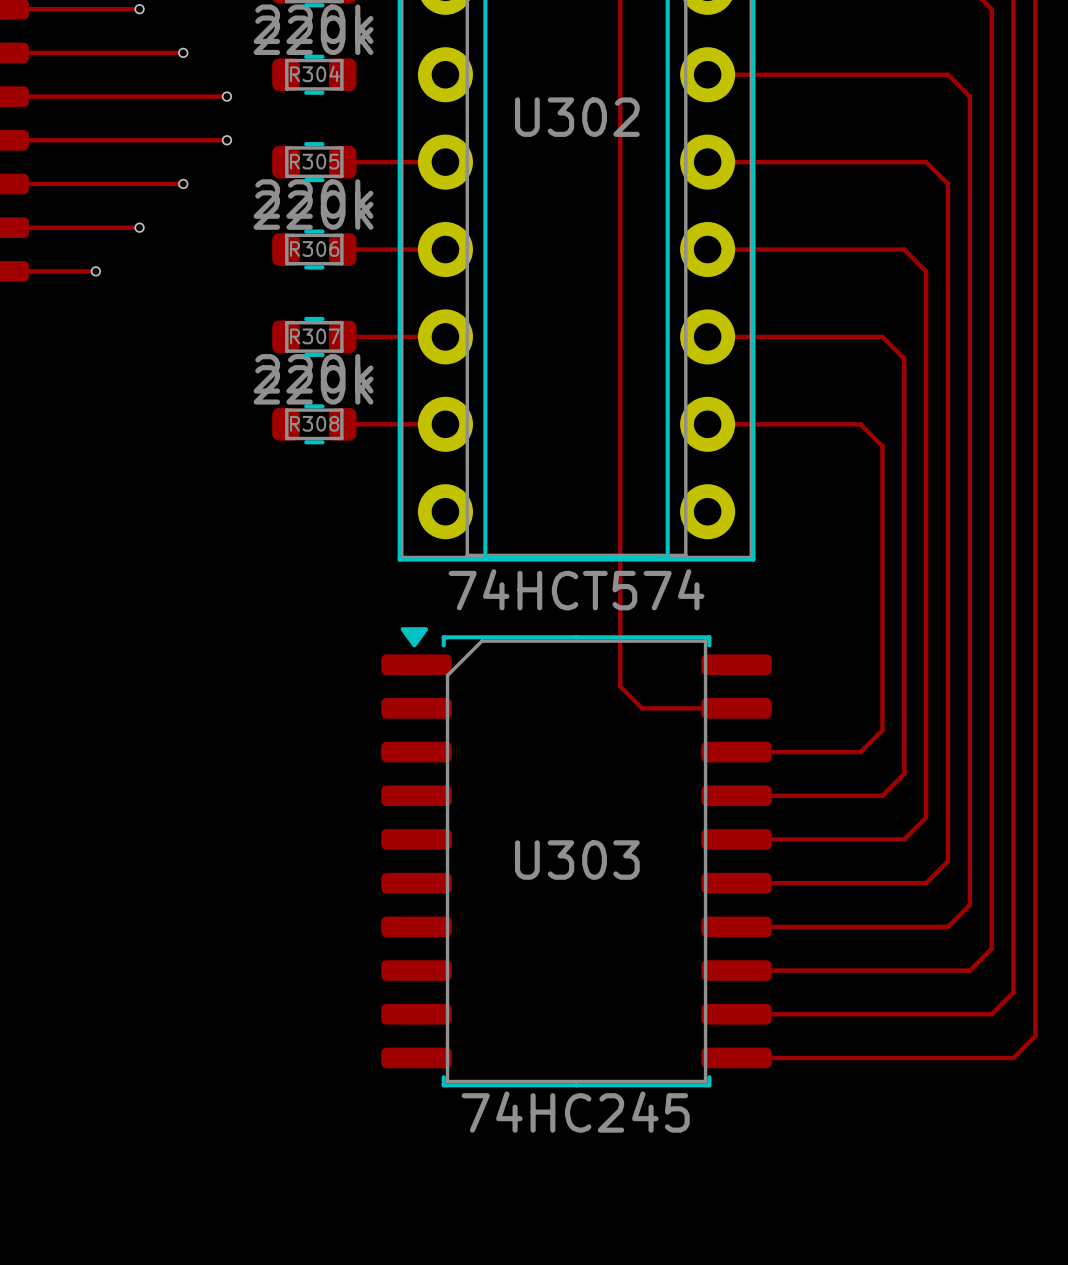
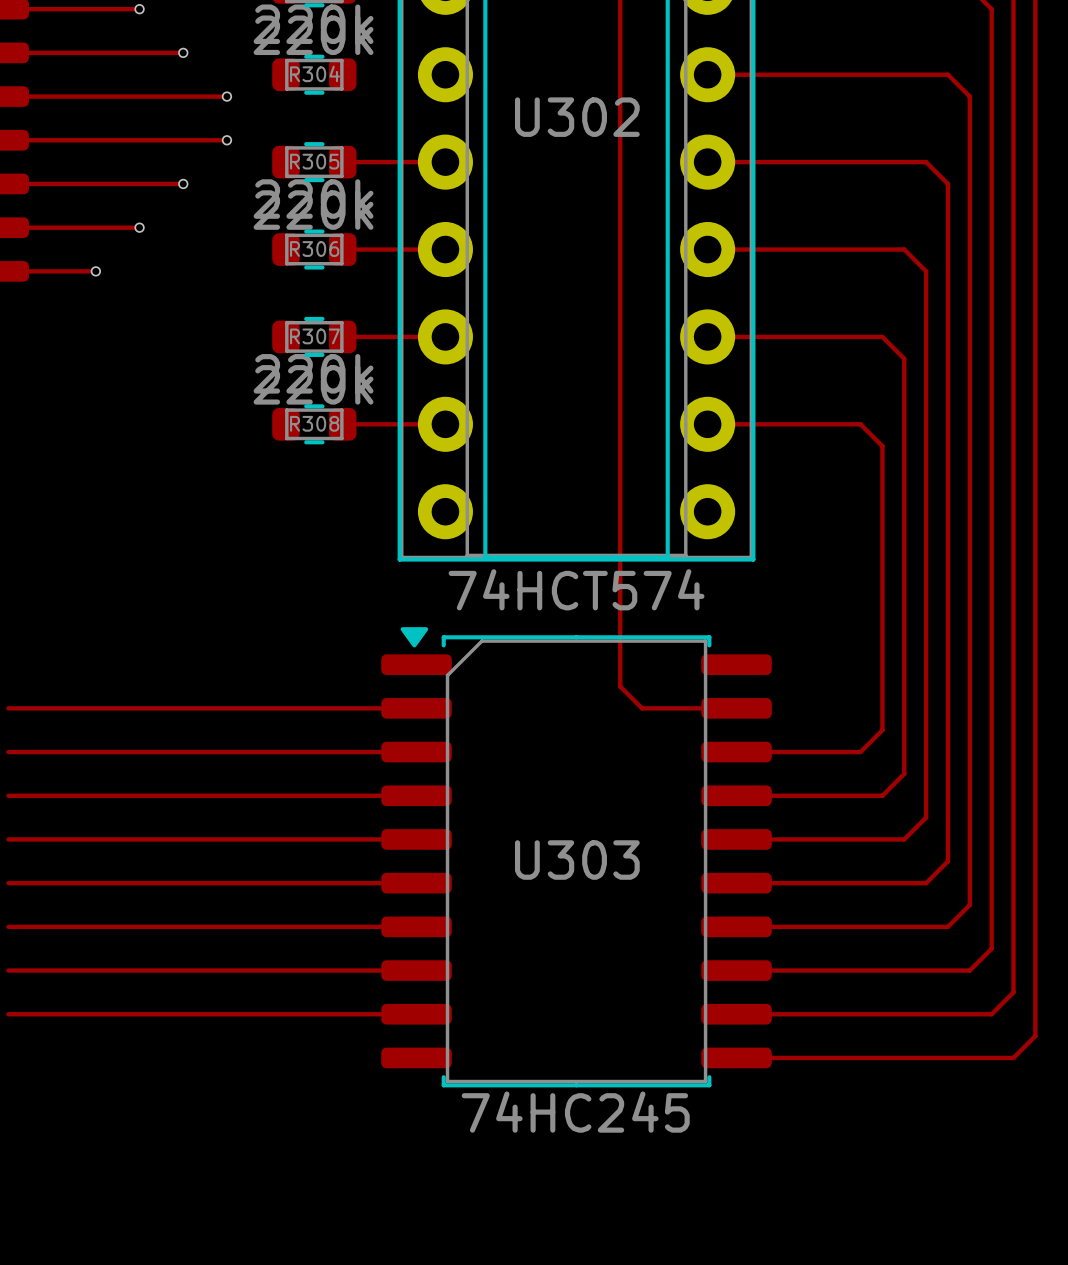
track: none -> (8, 708) (416, 708)
track: none -> (8, 752) (416, 752)
track: none -> (8, 795) (416, 795)
track: none -> (8, 839) (416, 839)
track: none -> (8, 883) (416, 883)
track: none -> (8, 926) (416, 926)
track: none -> (8, 970) (416, 970)
track: none -> (8, 1014) (416, 1014)

